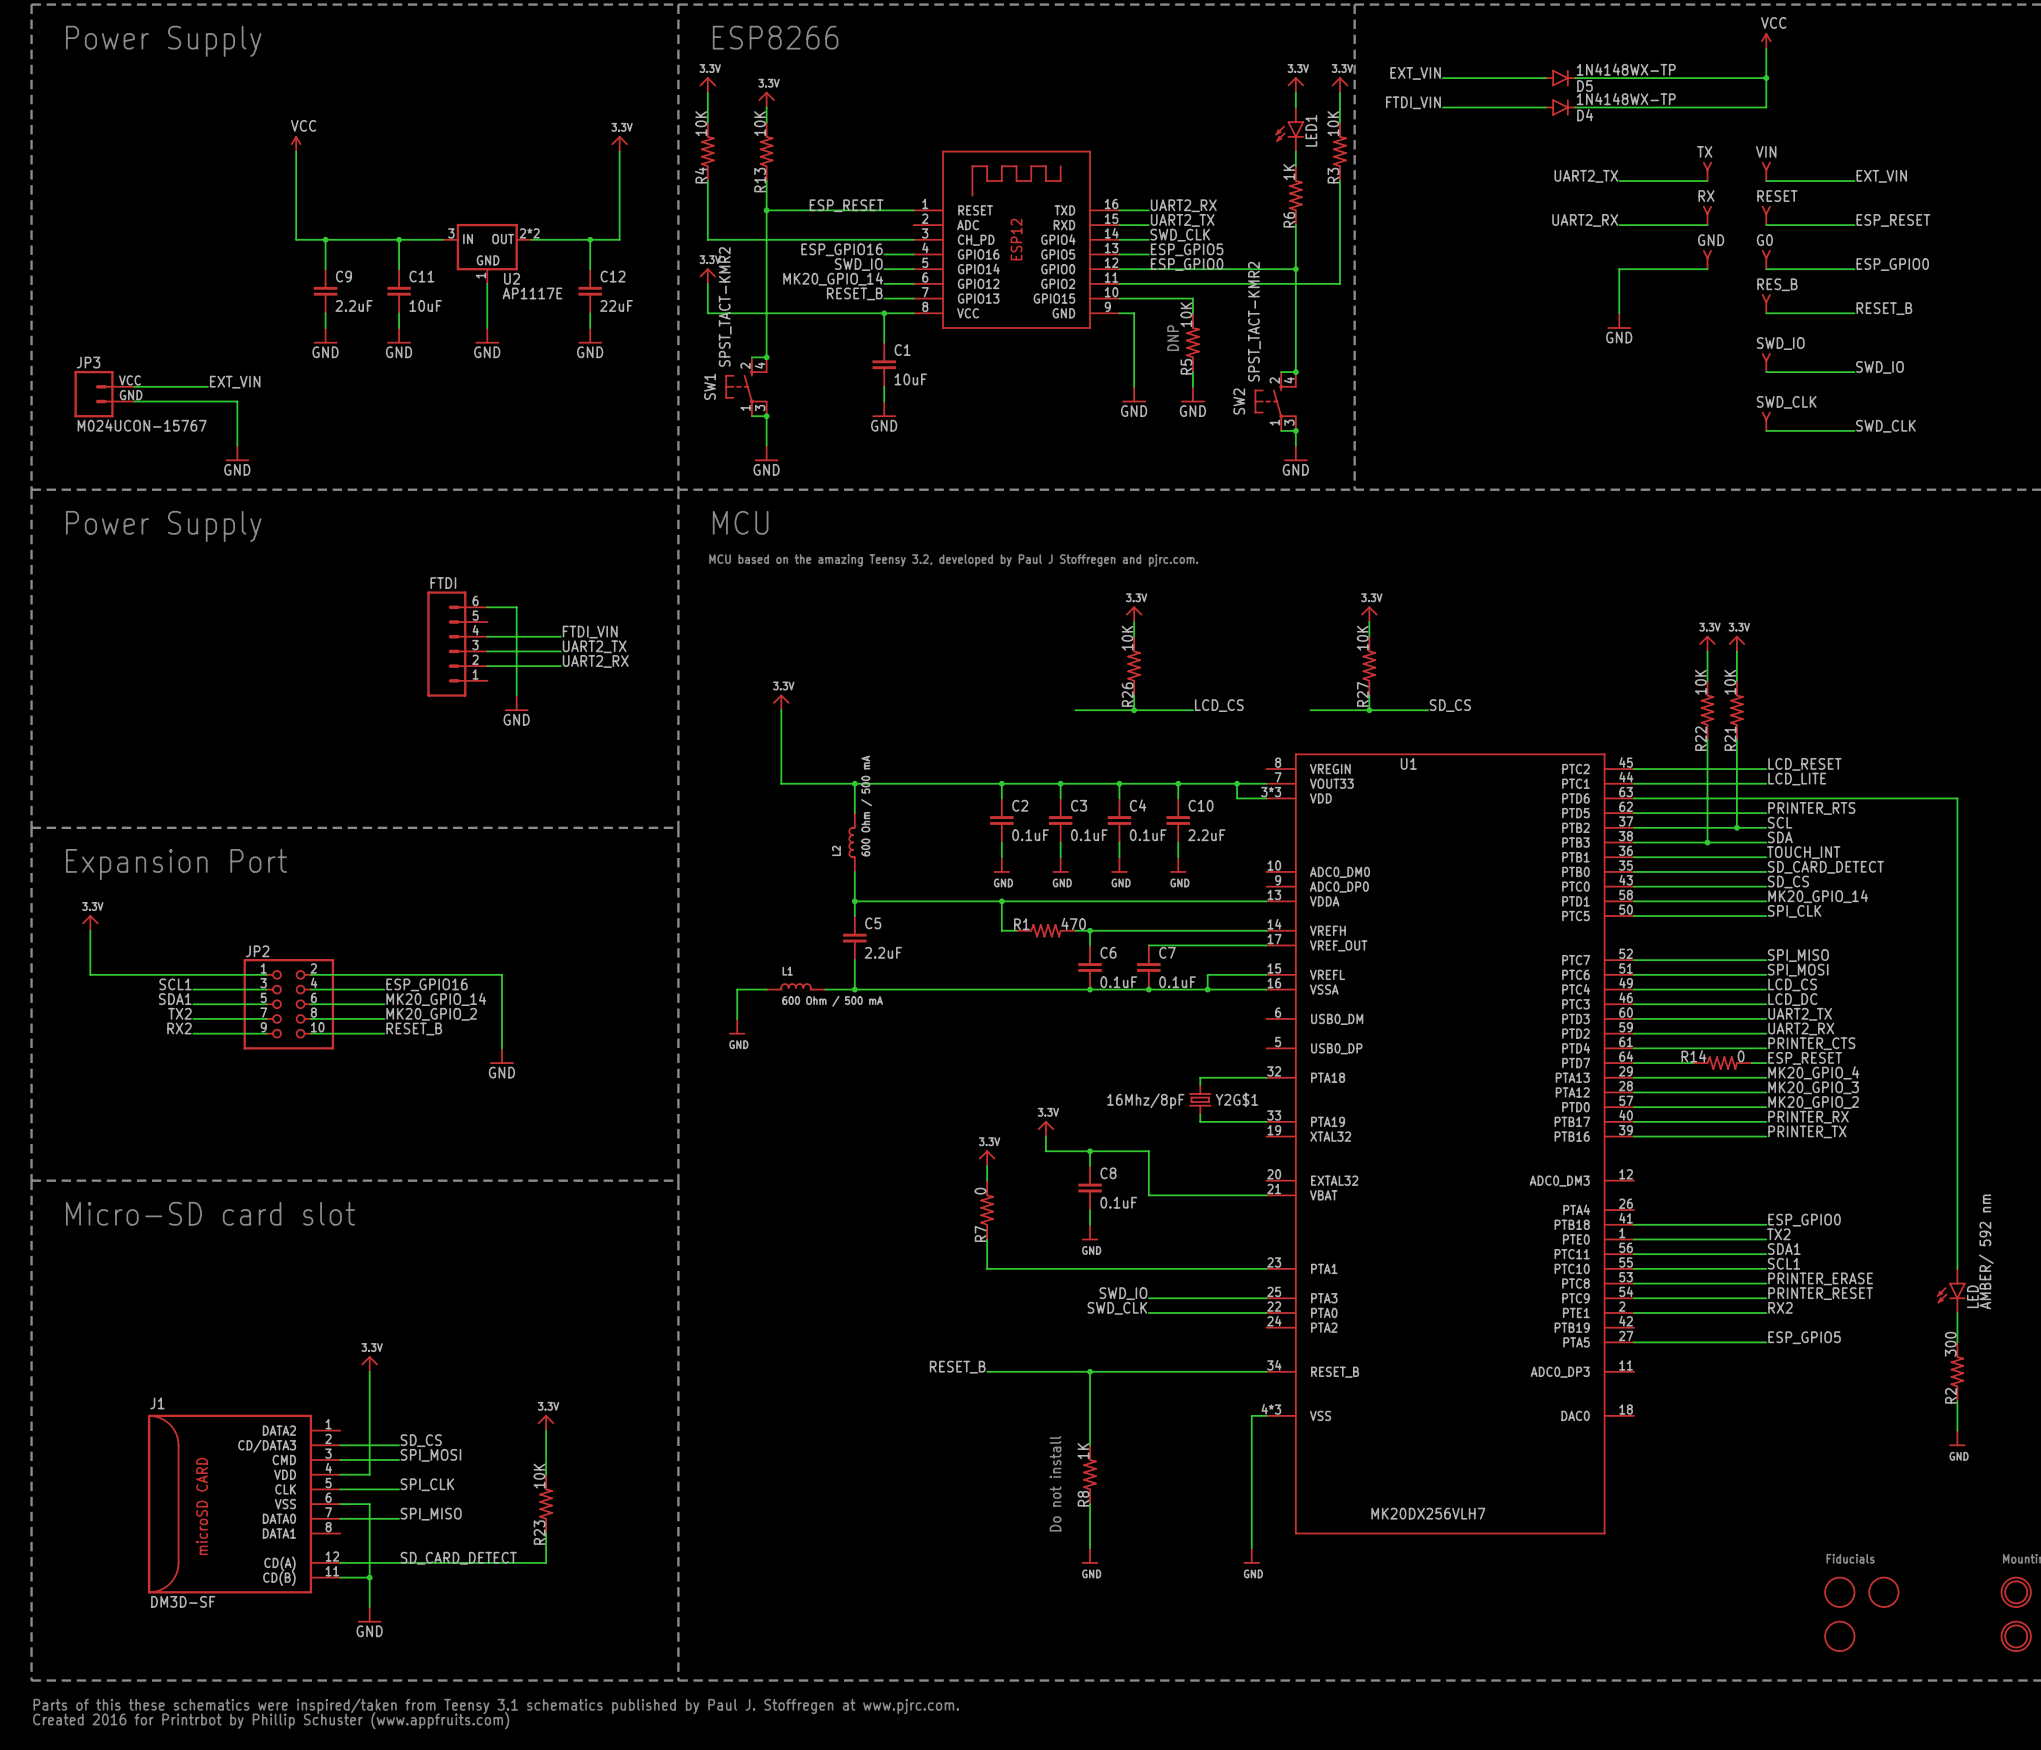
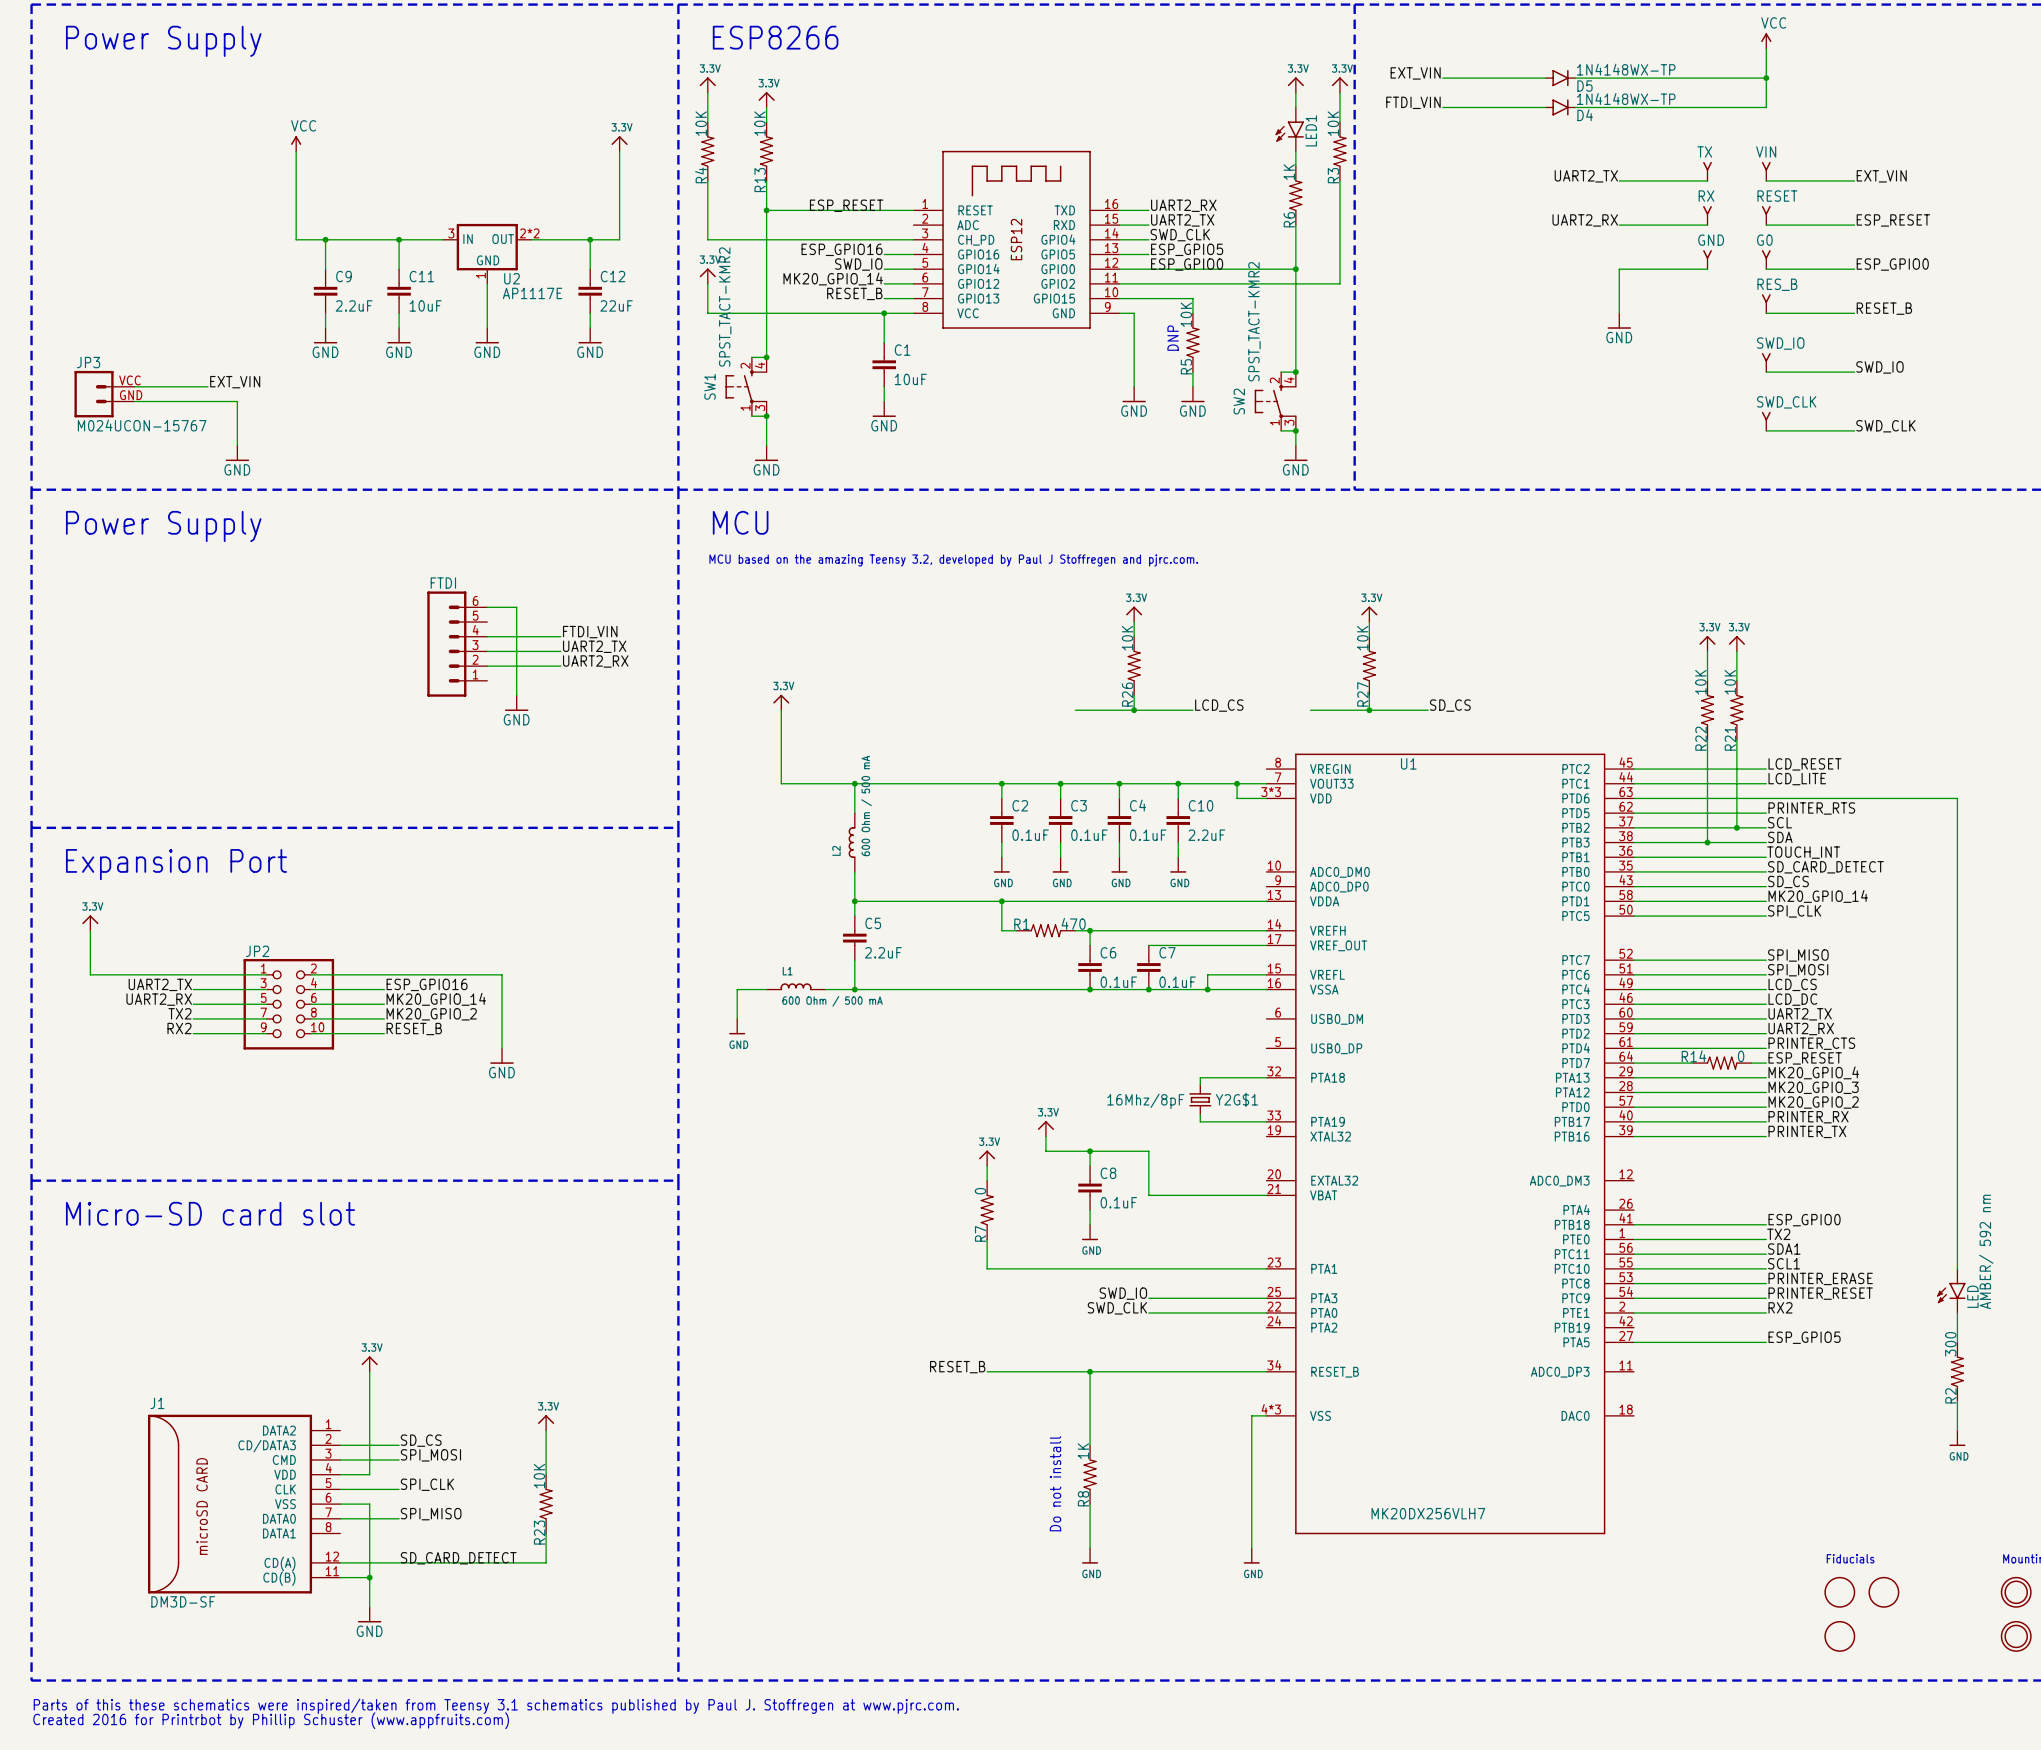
label: SCL1 (175, 984) -> UART2_TX (160, 984)
label: SDA1 (175, 999) -> UART2_RX (159, 999)

